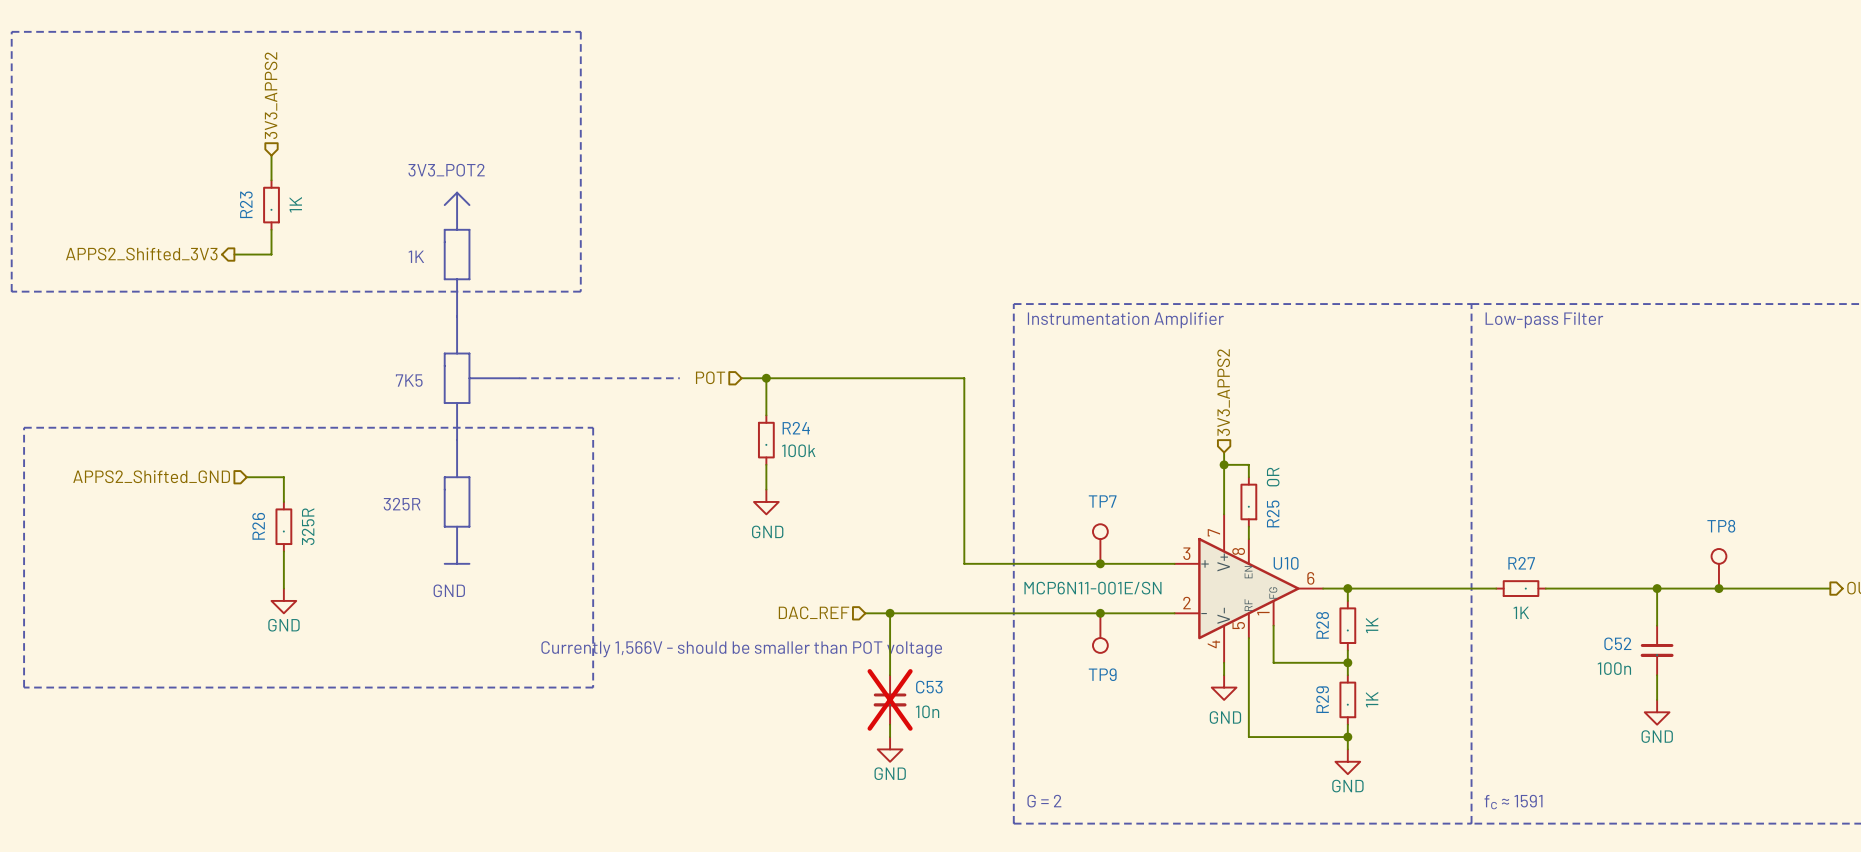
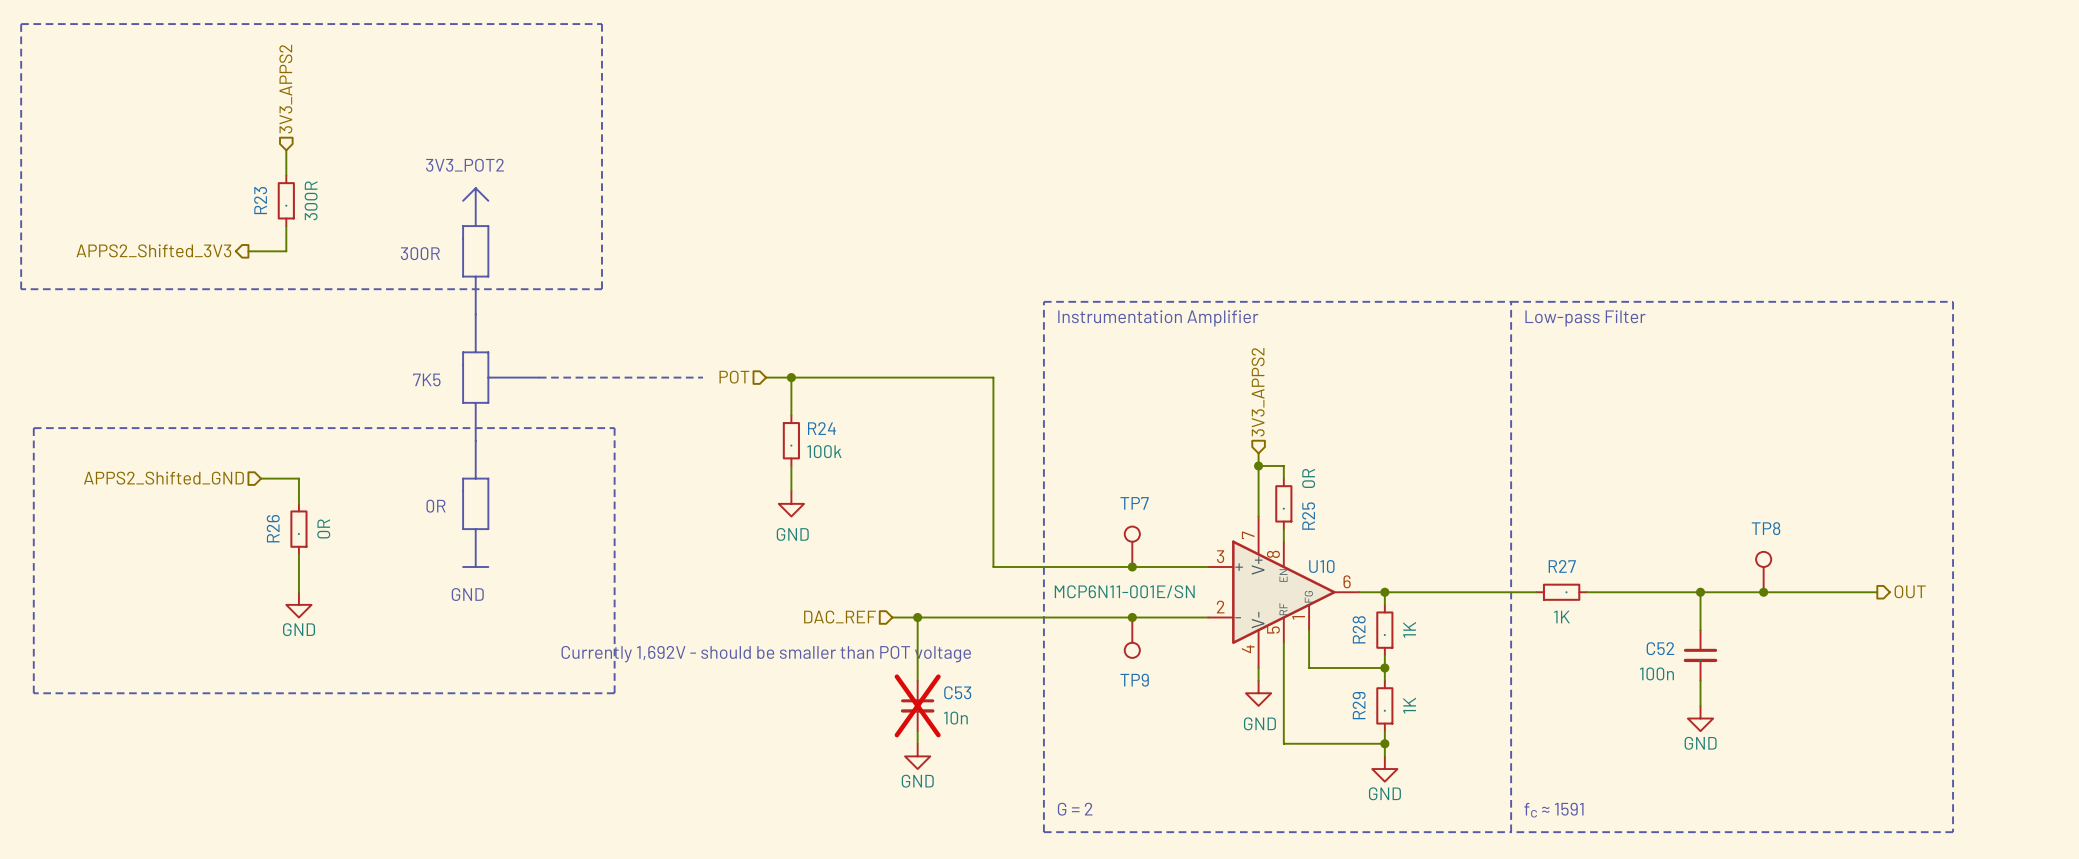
R23 value: 1K (295, 204) -> 300R (311, 200)
text: none -> 300R (420, 253)
text: 1K (416, 256) -> none
text: 325R (402, 504) -> none
text: none -> 0R (436, 506)
R26 value: 325R (308, 526) -> 0R (323, 528)
text: Currently 1,566V - should be smaller than POT voltage (741, 649) -> Currently 1,692V - should be smaller than POT voltage (766, 654)

